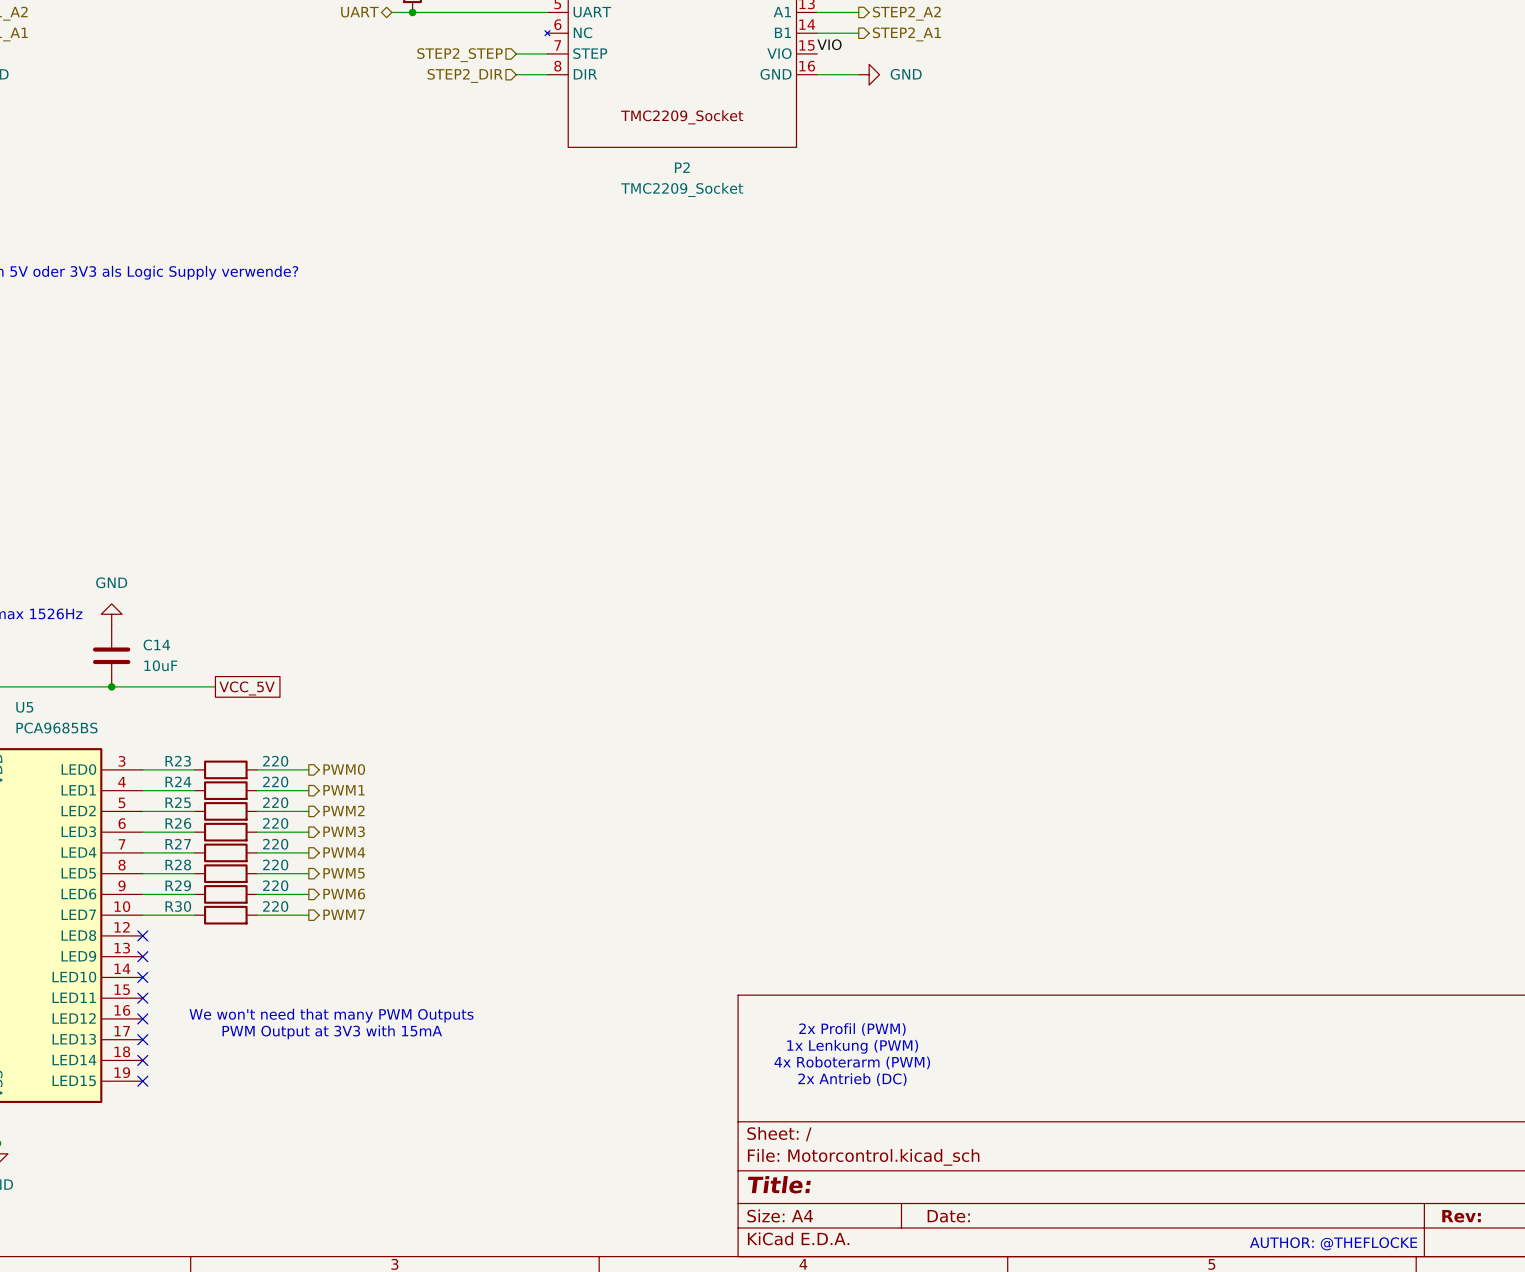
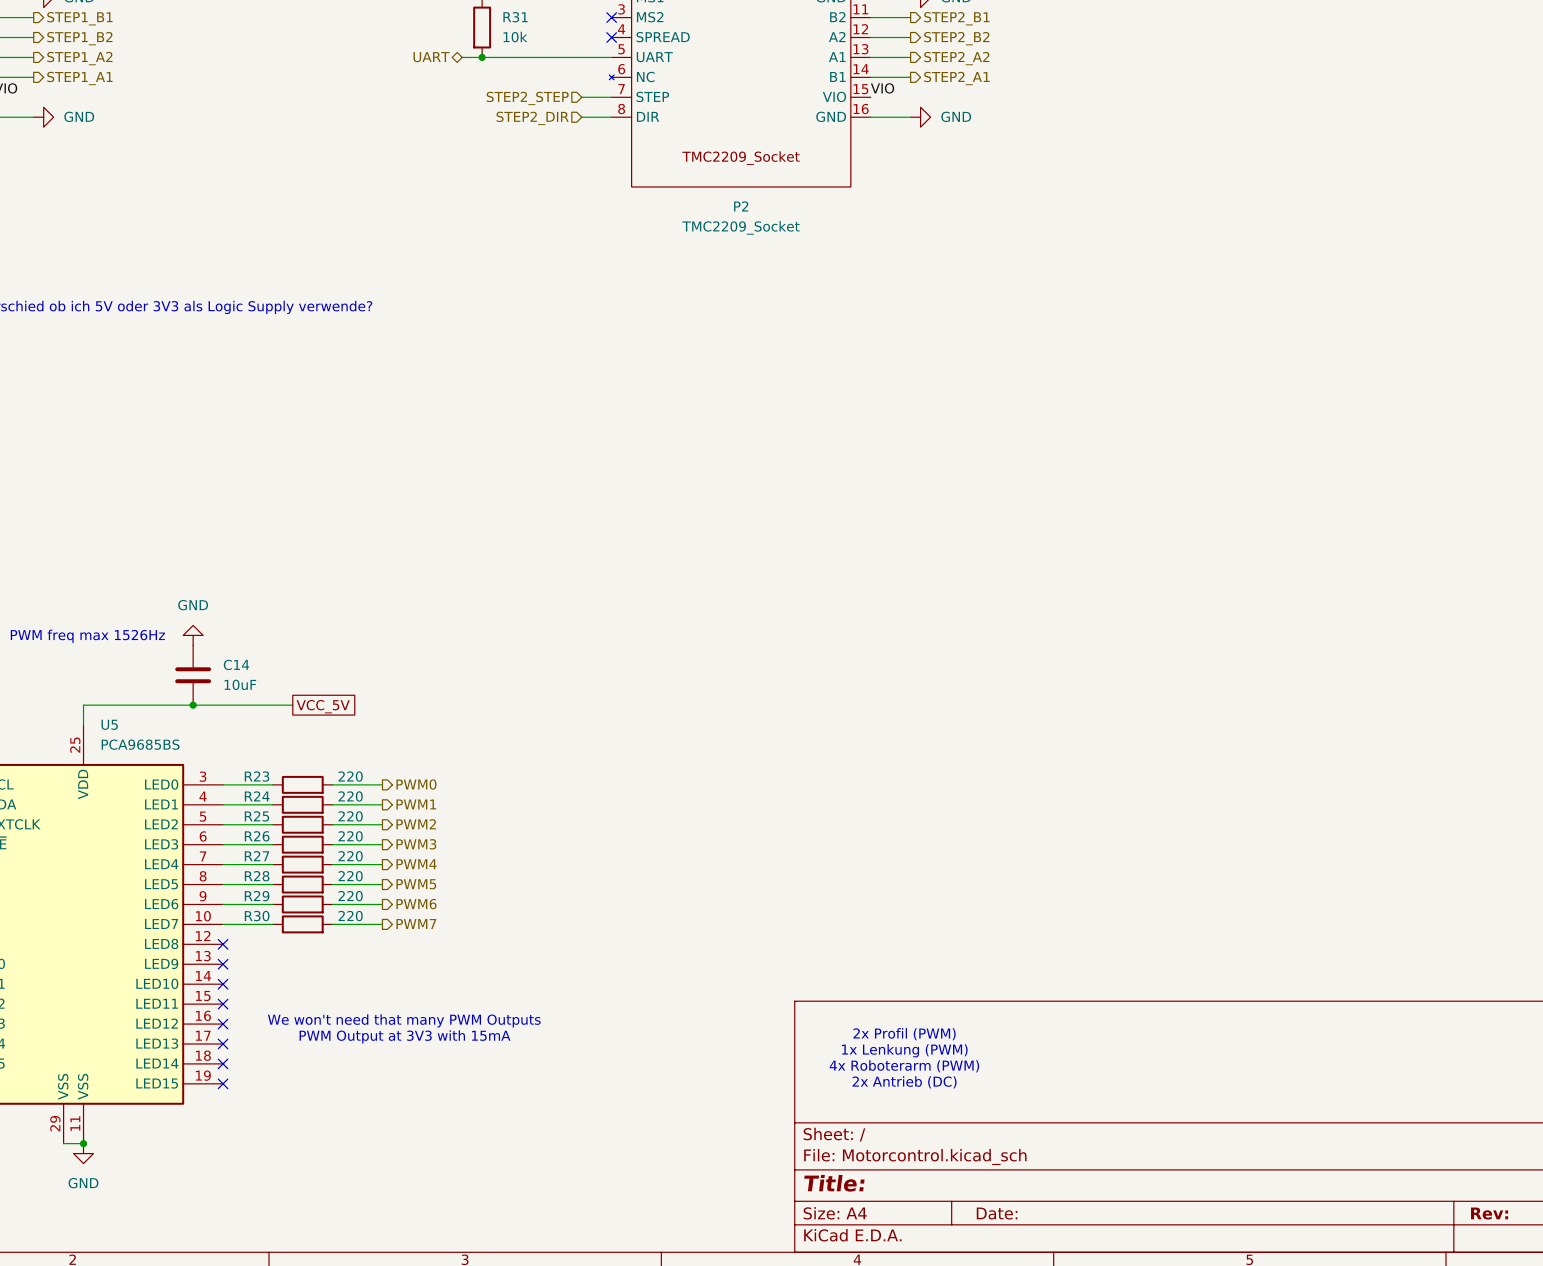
text: AUTHOR: @THEFLOCKE (1333, 1243) -> none

